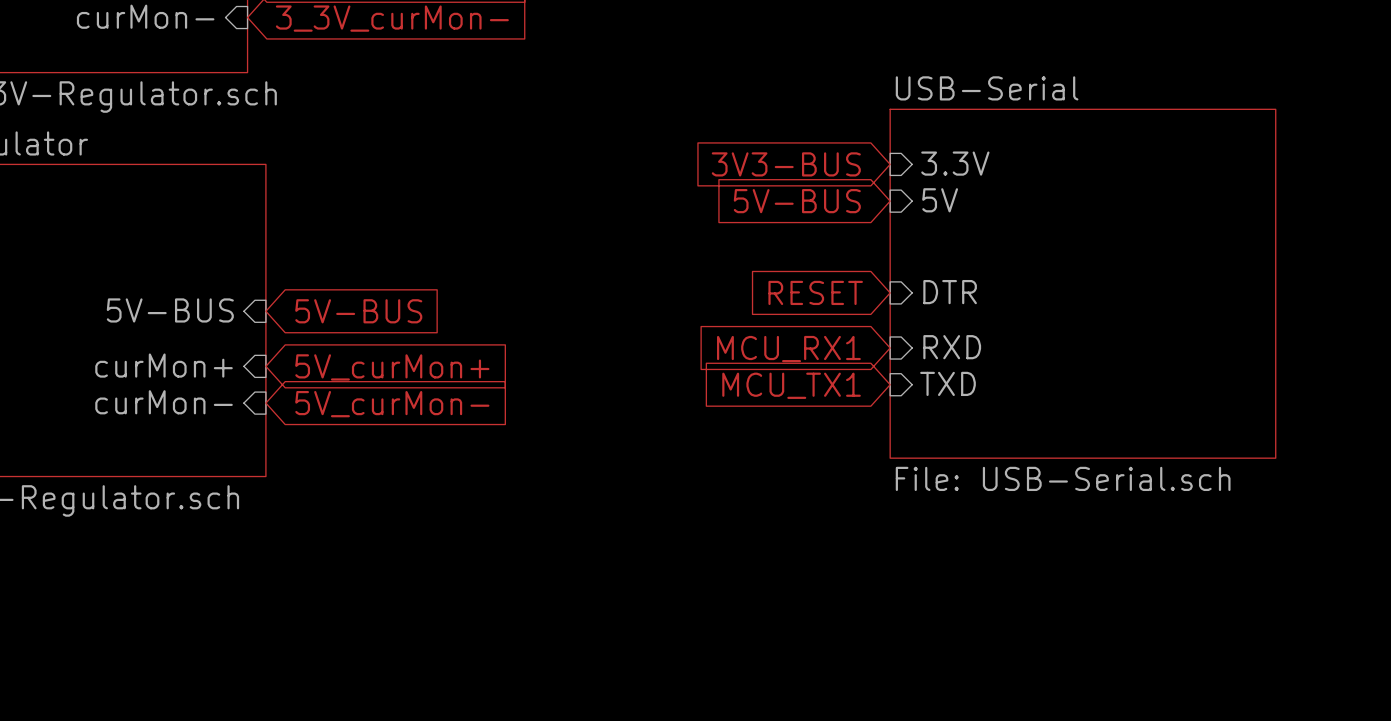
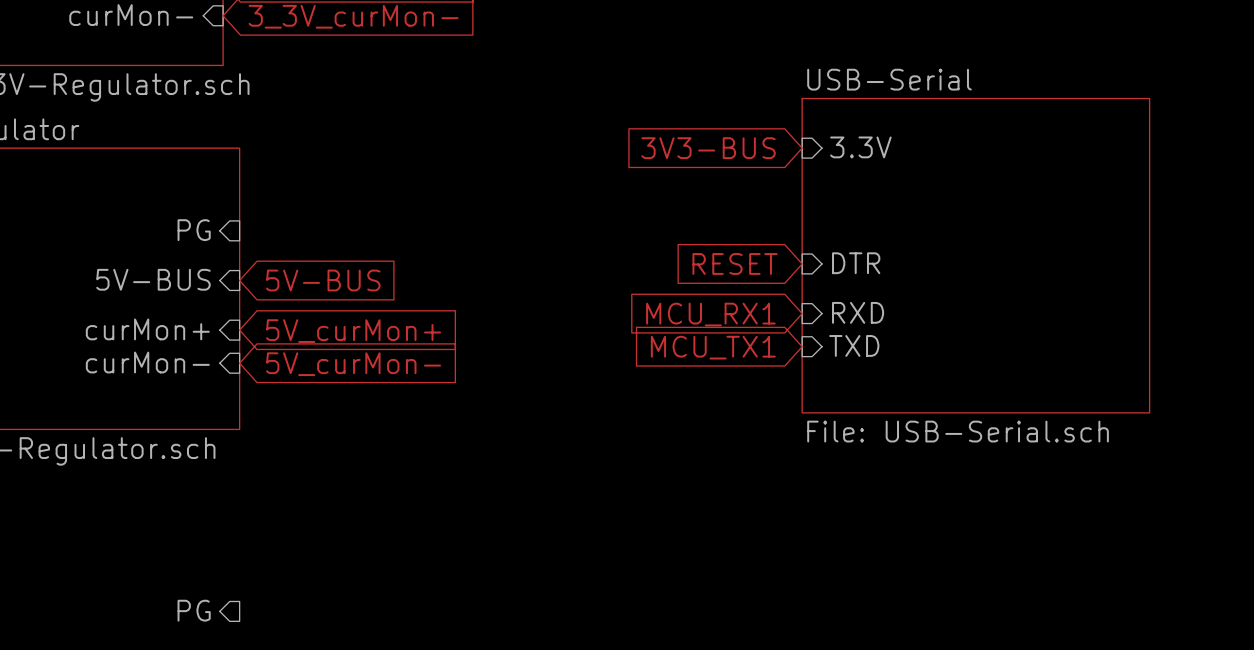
sheet pin: 5V (940, 200) -> none
global label: 5V-BUS (797, 201) -> none
sheet pin: none -> PG (194, 230)
sheet pin: none -> PG (194, 610)

